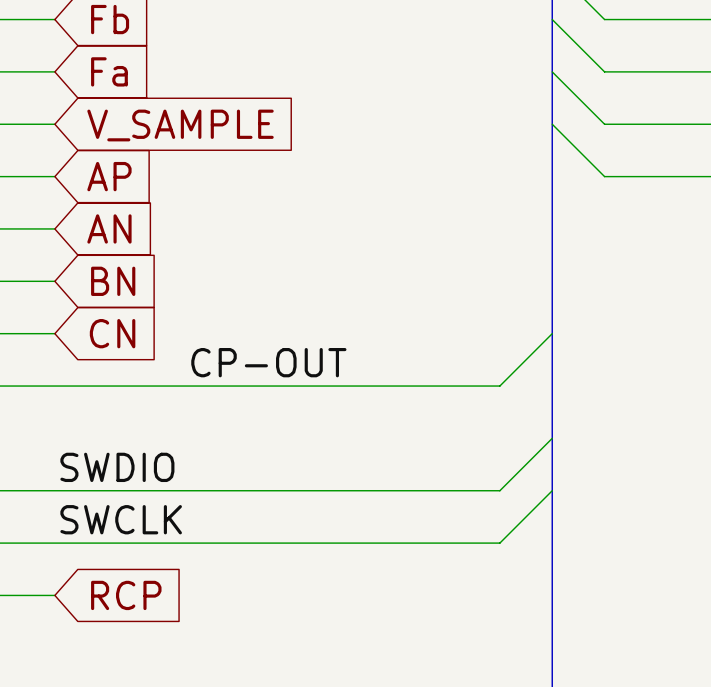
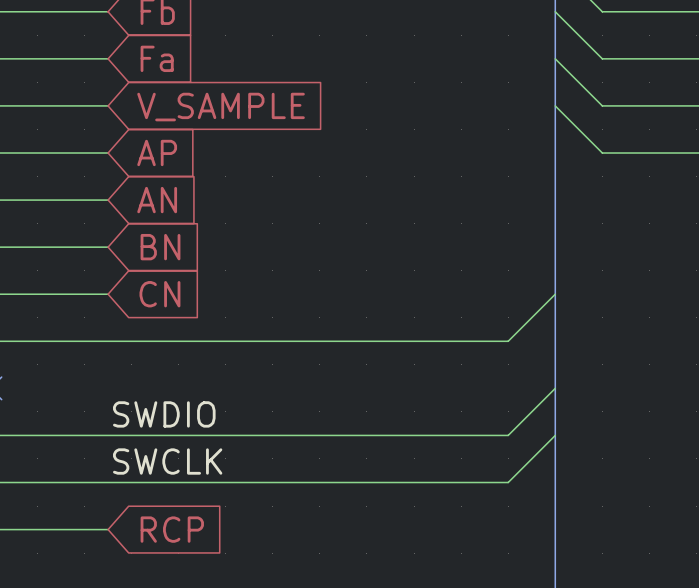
label: CP-OUT (268, 362) -> none

